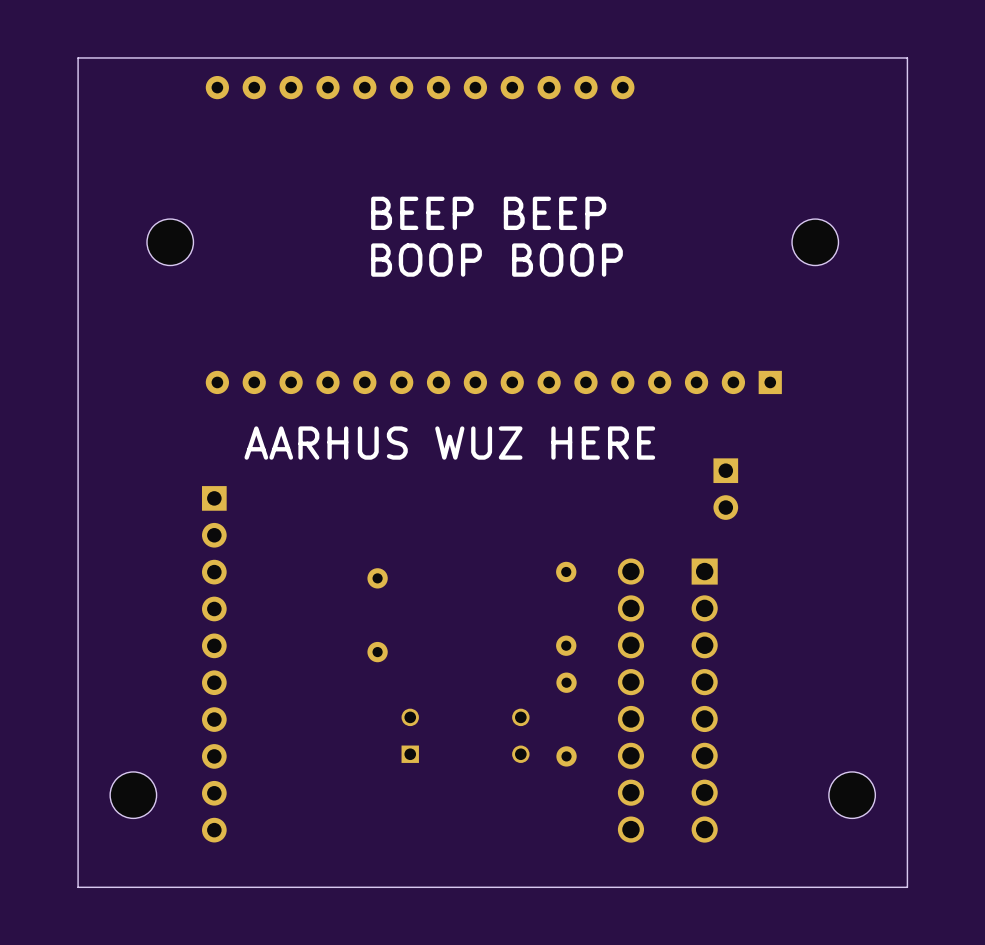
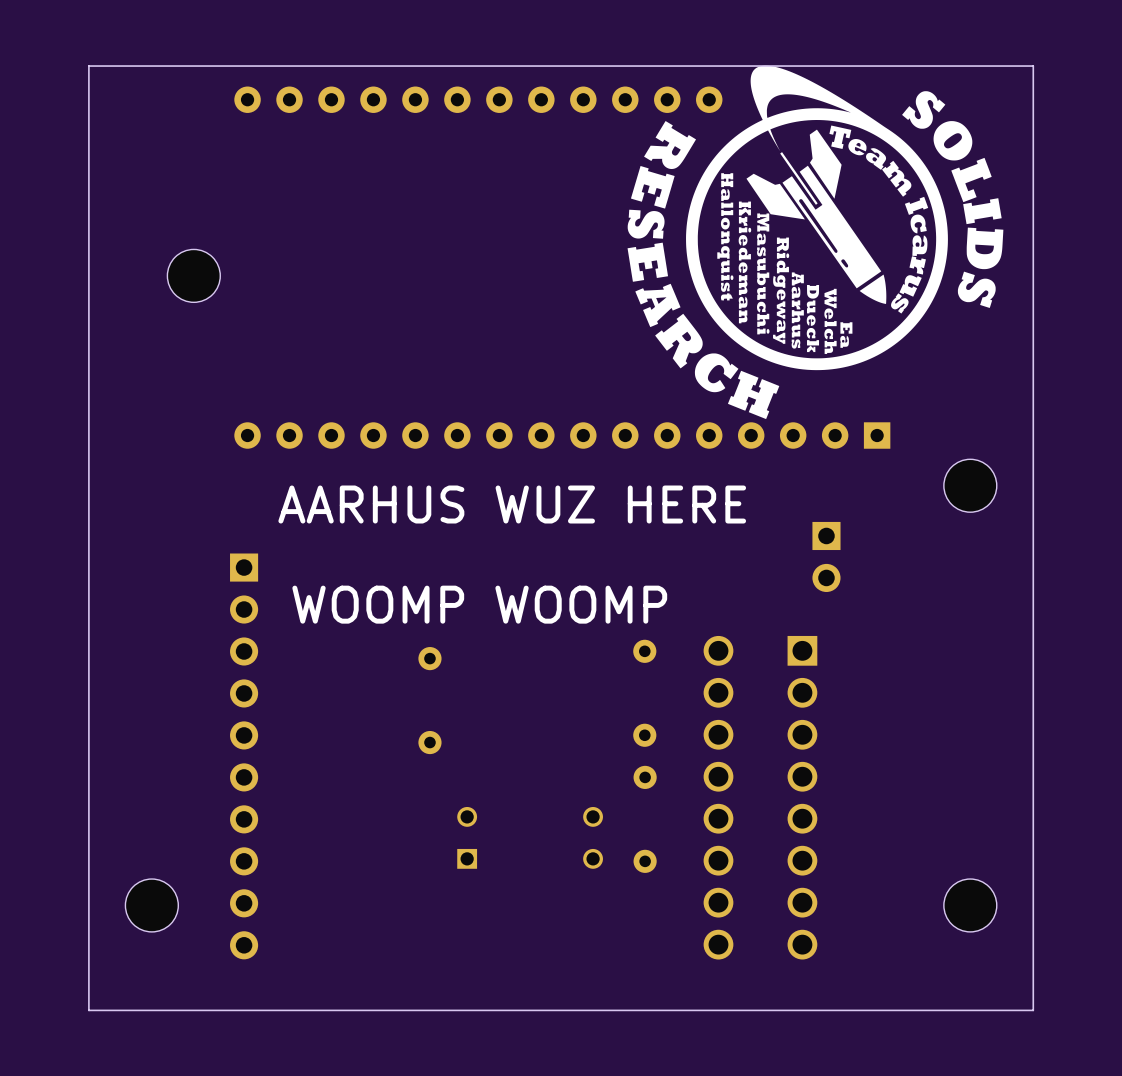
drawing: none -> [627, 65, 1004, 420]
text: BEEP BEEP (488, 213) -> none
part position: (815, 242) -> (970, 485)
text: BOOP BOOP (496, 260) -> none
text: none -> WOOMP WOOMP (479, 604)

